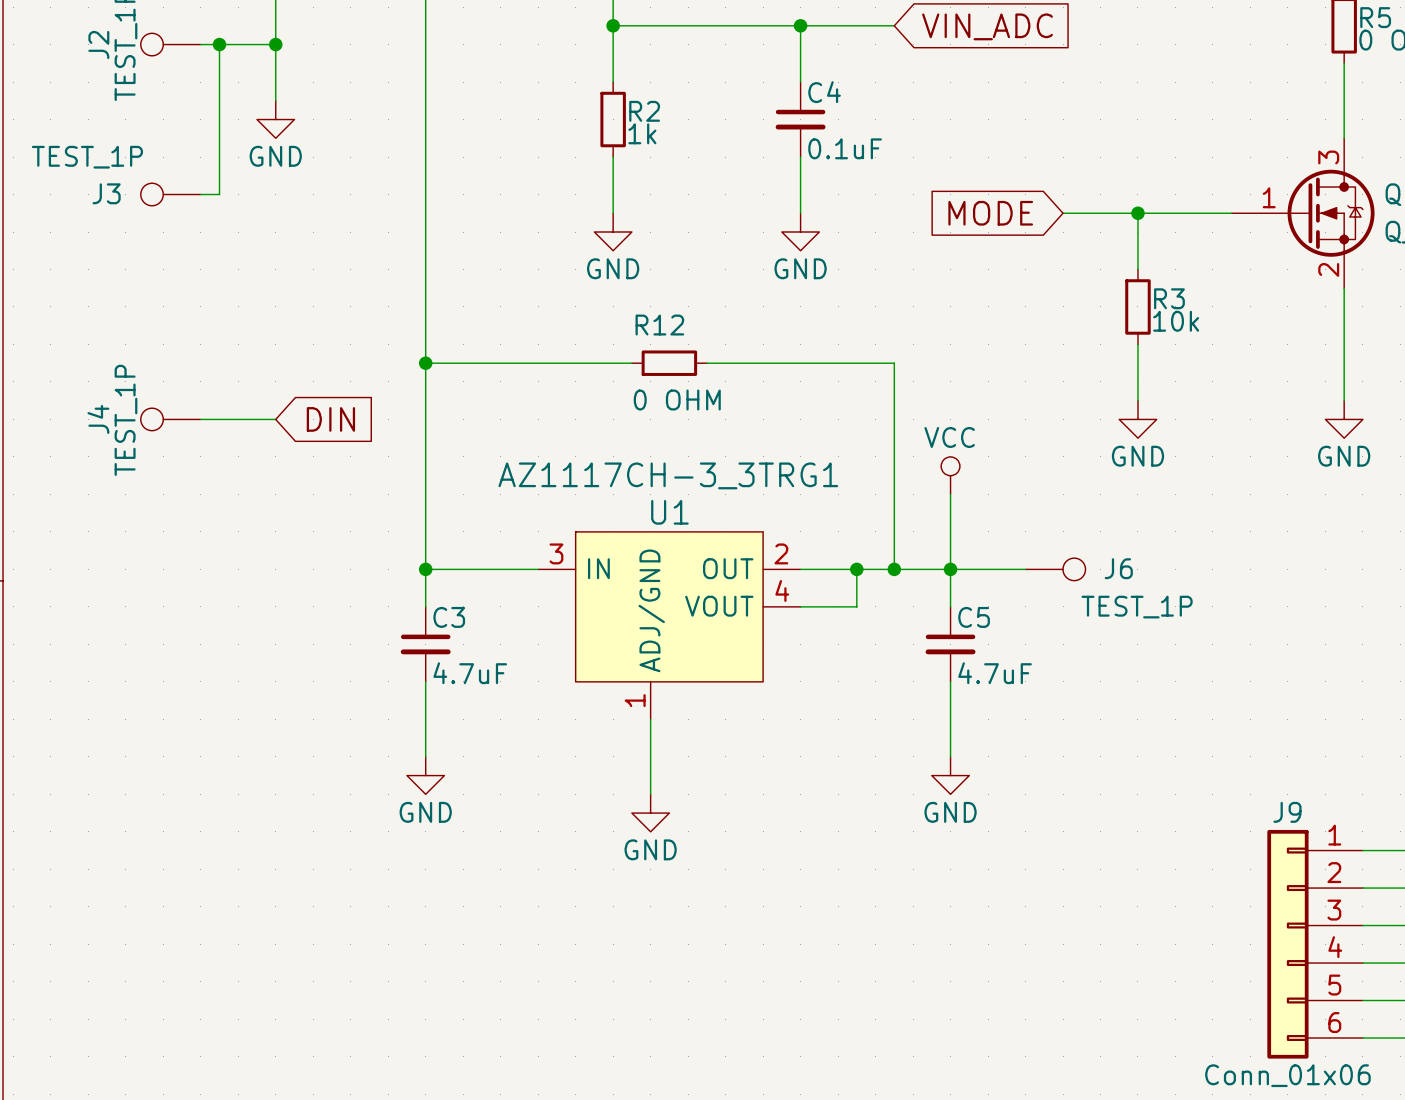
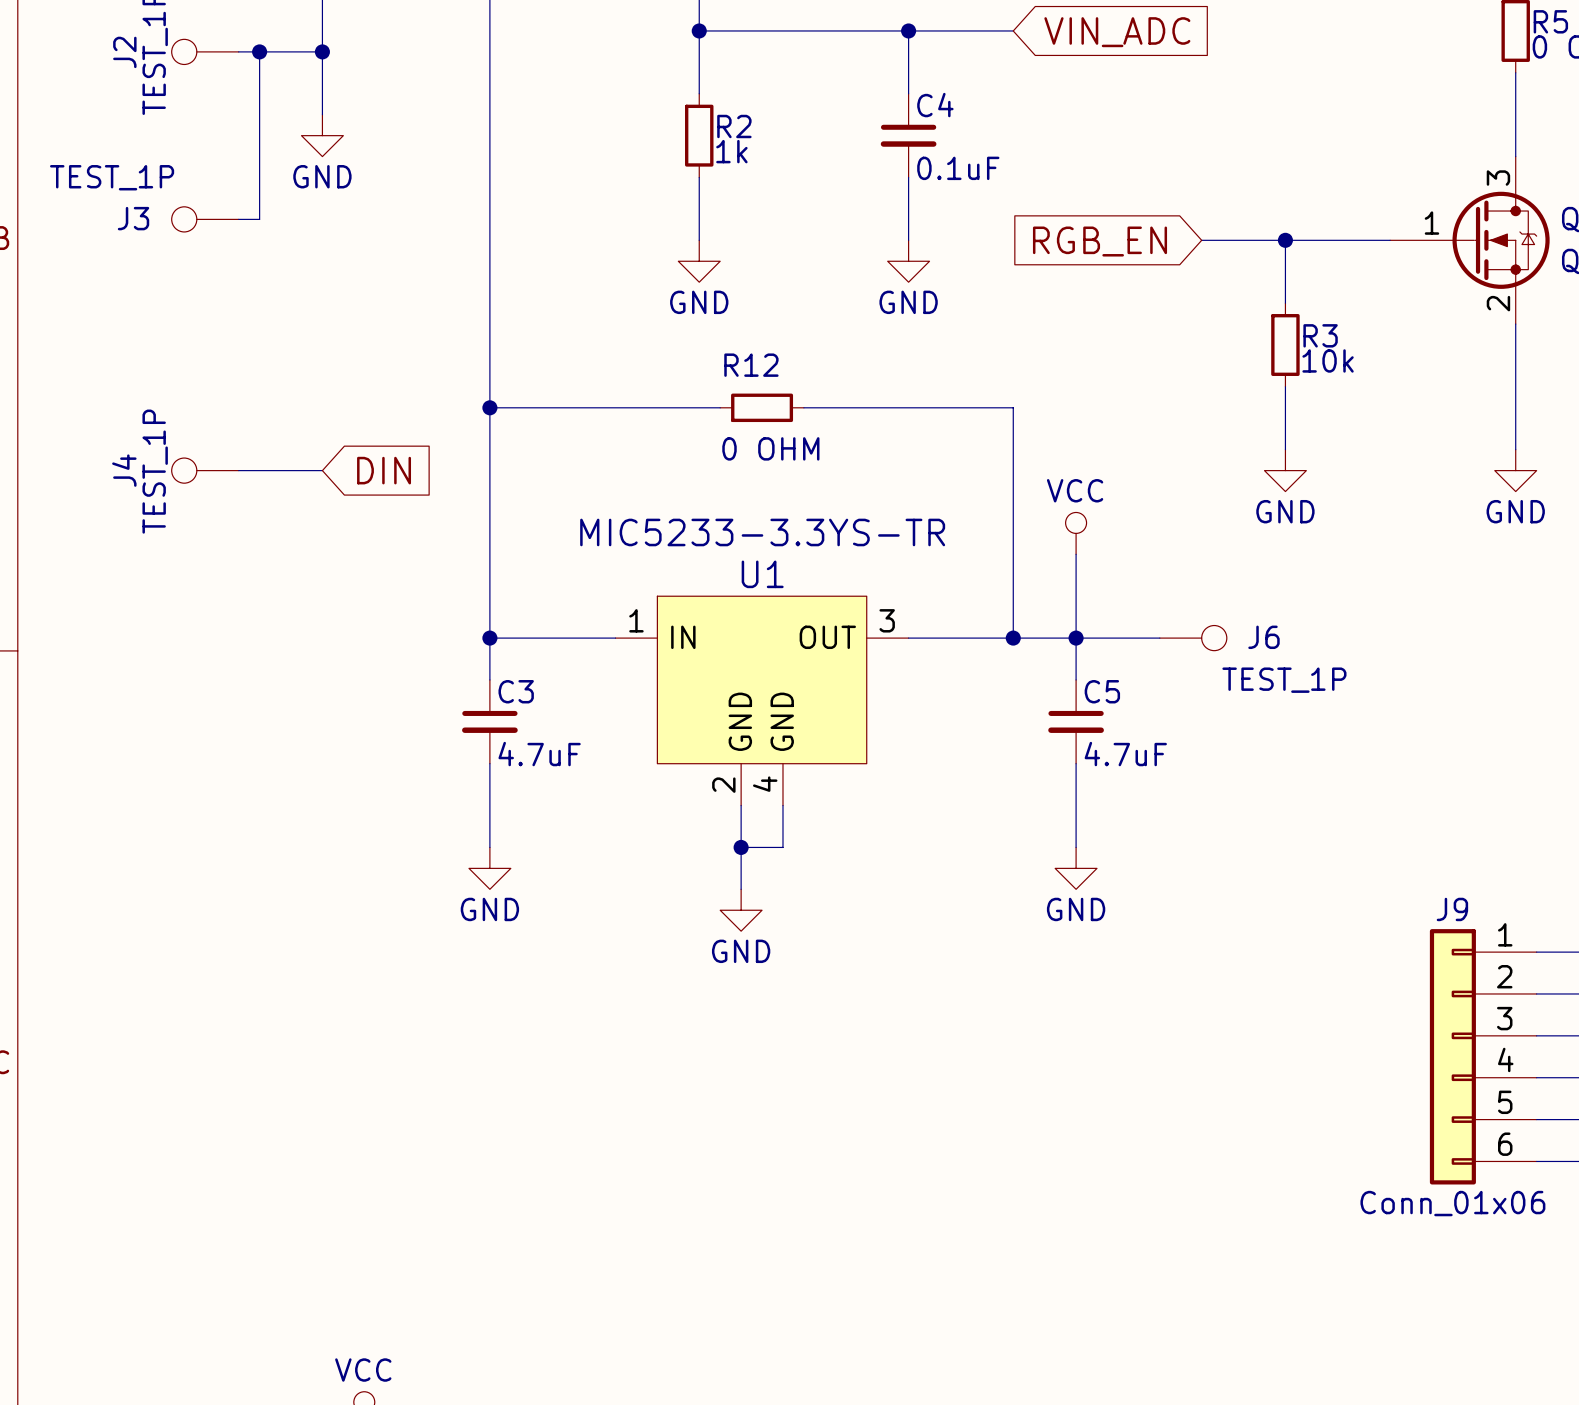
global label: MODE (990, 213) -> RGB_EN (1100, 241)
U1 value: AZ1117CH-3_3TRG1 (668, 475) -> MIC5233-3.3YS-TR (762, 532)
U1 symbol: [538, 531, 801, 720] -> [615, 596, 909, 806]
wire: (856, 569) (856, 606) (800, 606) -> none
junction: (856, 569) -> none
wire: none -> (782, 805) (782, 847) (741, 847)
junction: none -> (741, 847)

